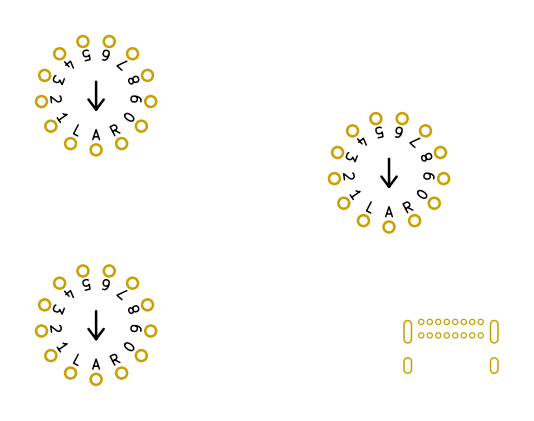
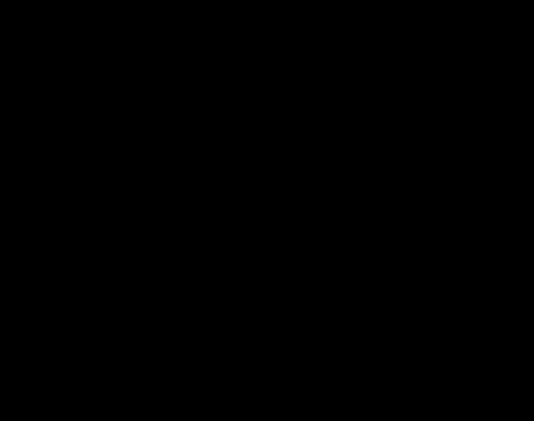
part: (96, 95) -> none
part: (389, 172) -> none
part: (96, 325) -> none
part: (450, 346) -> none

